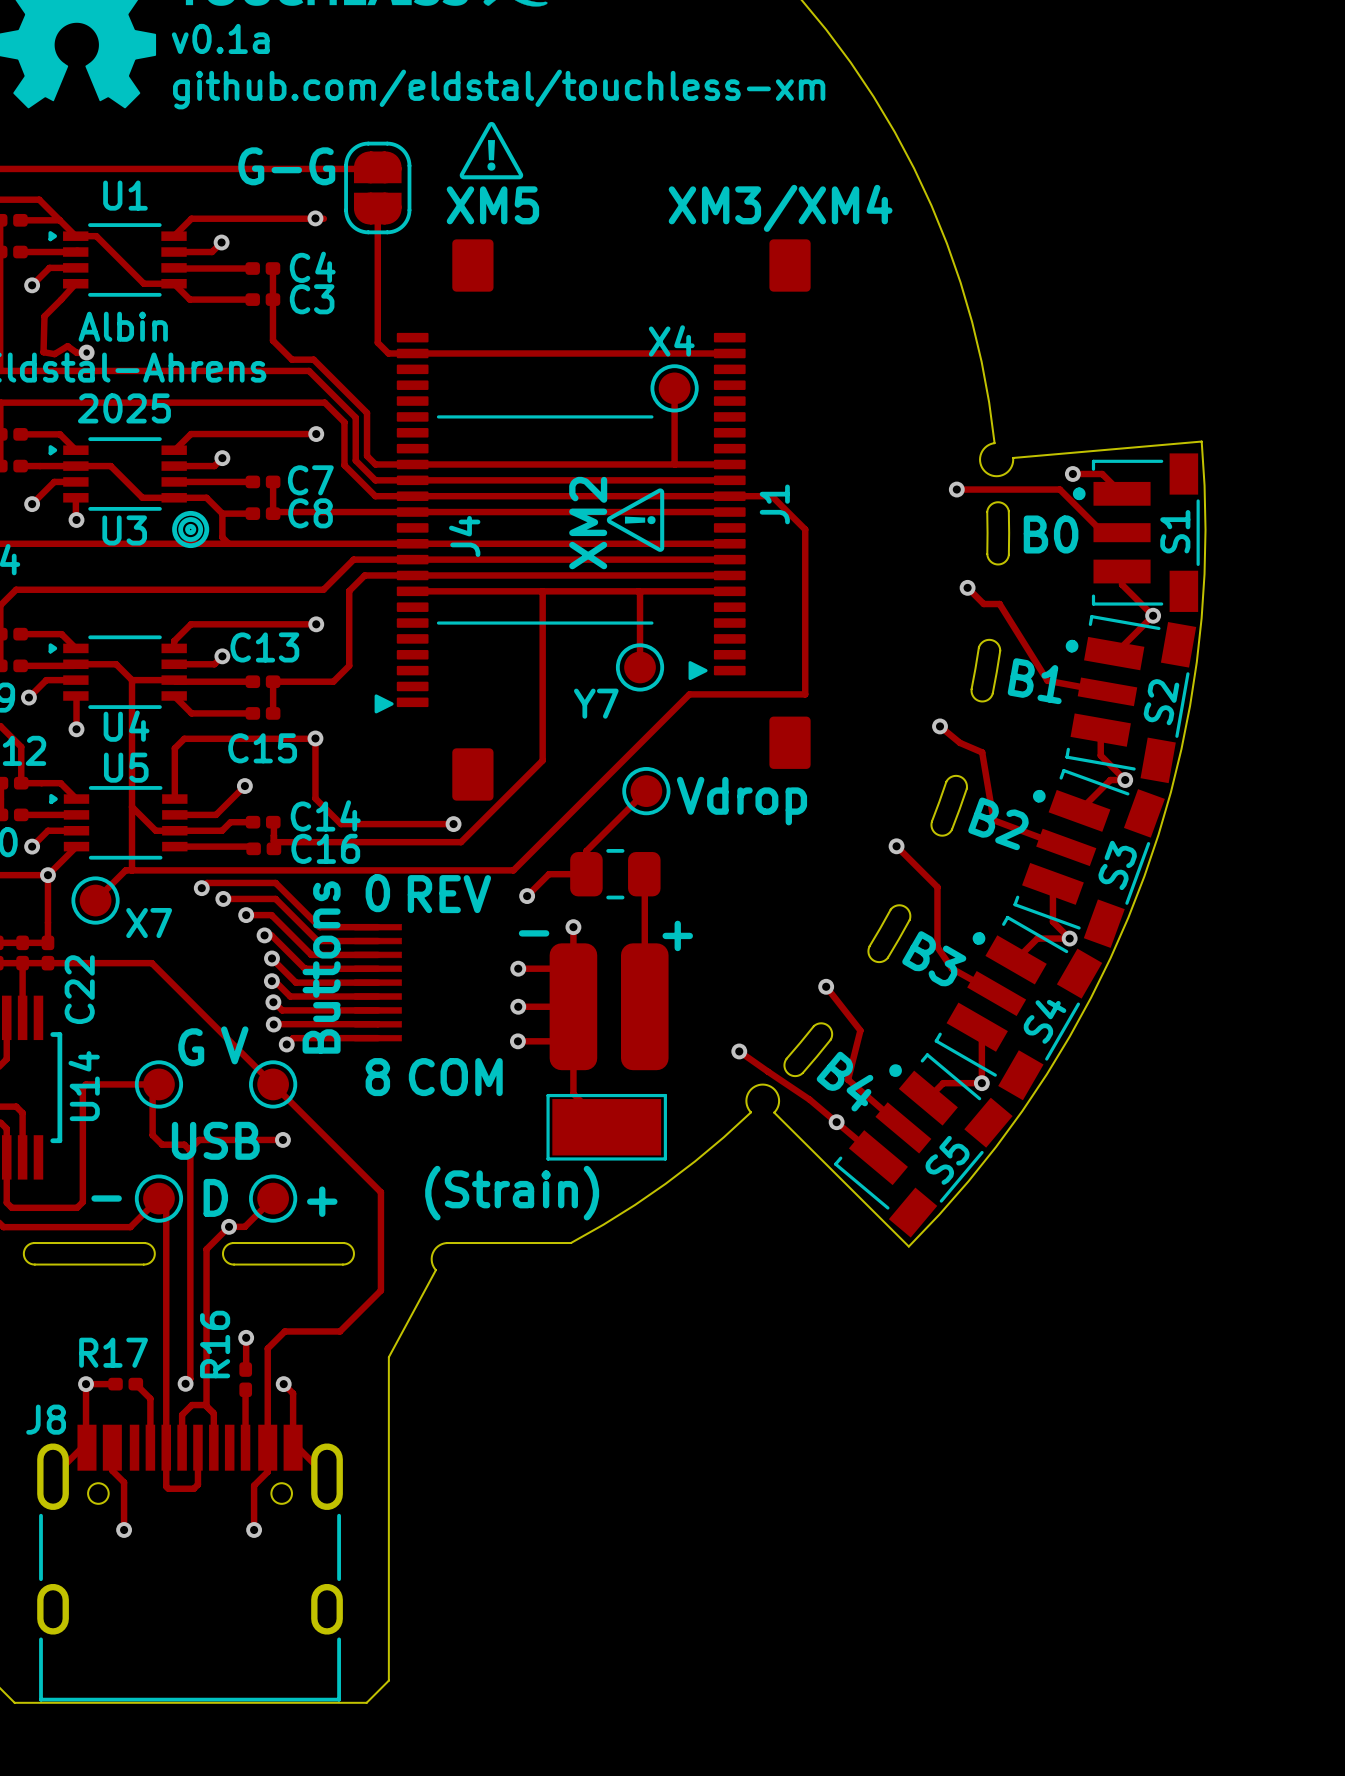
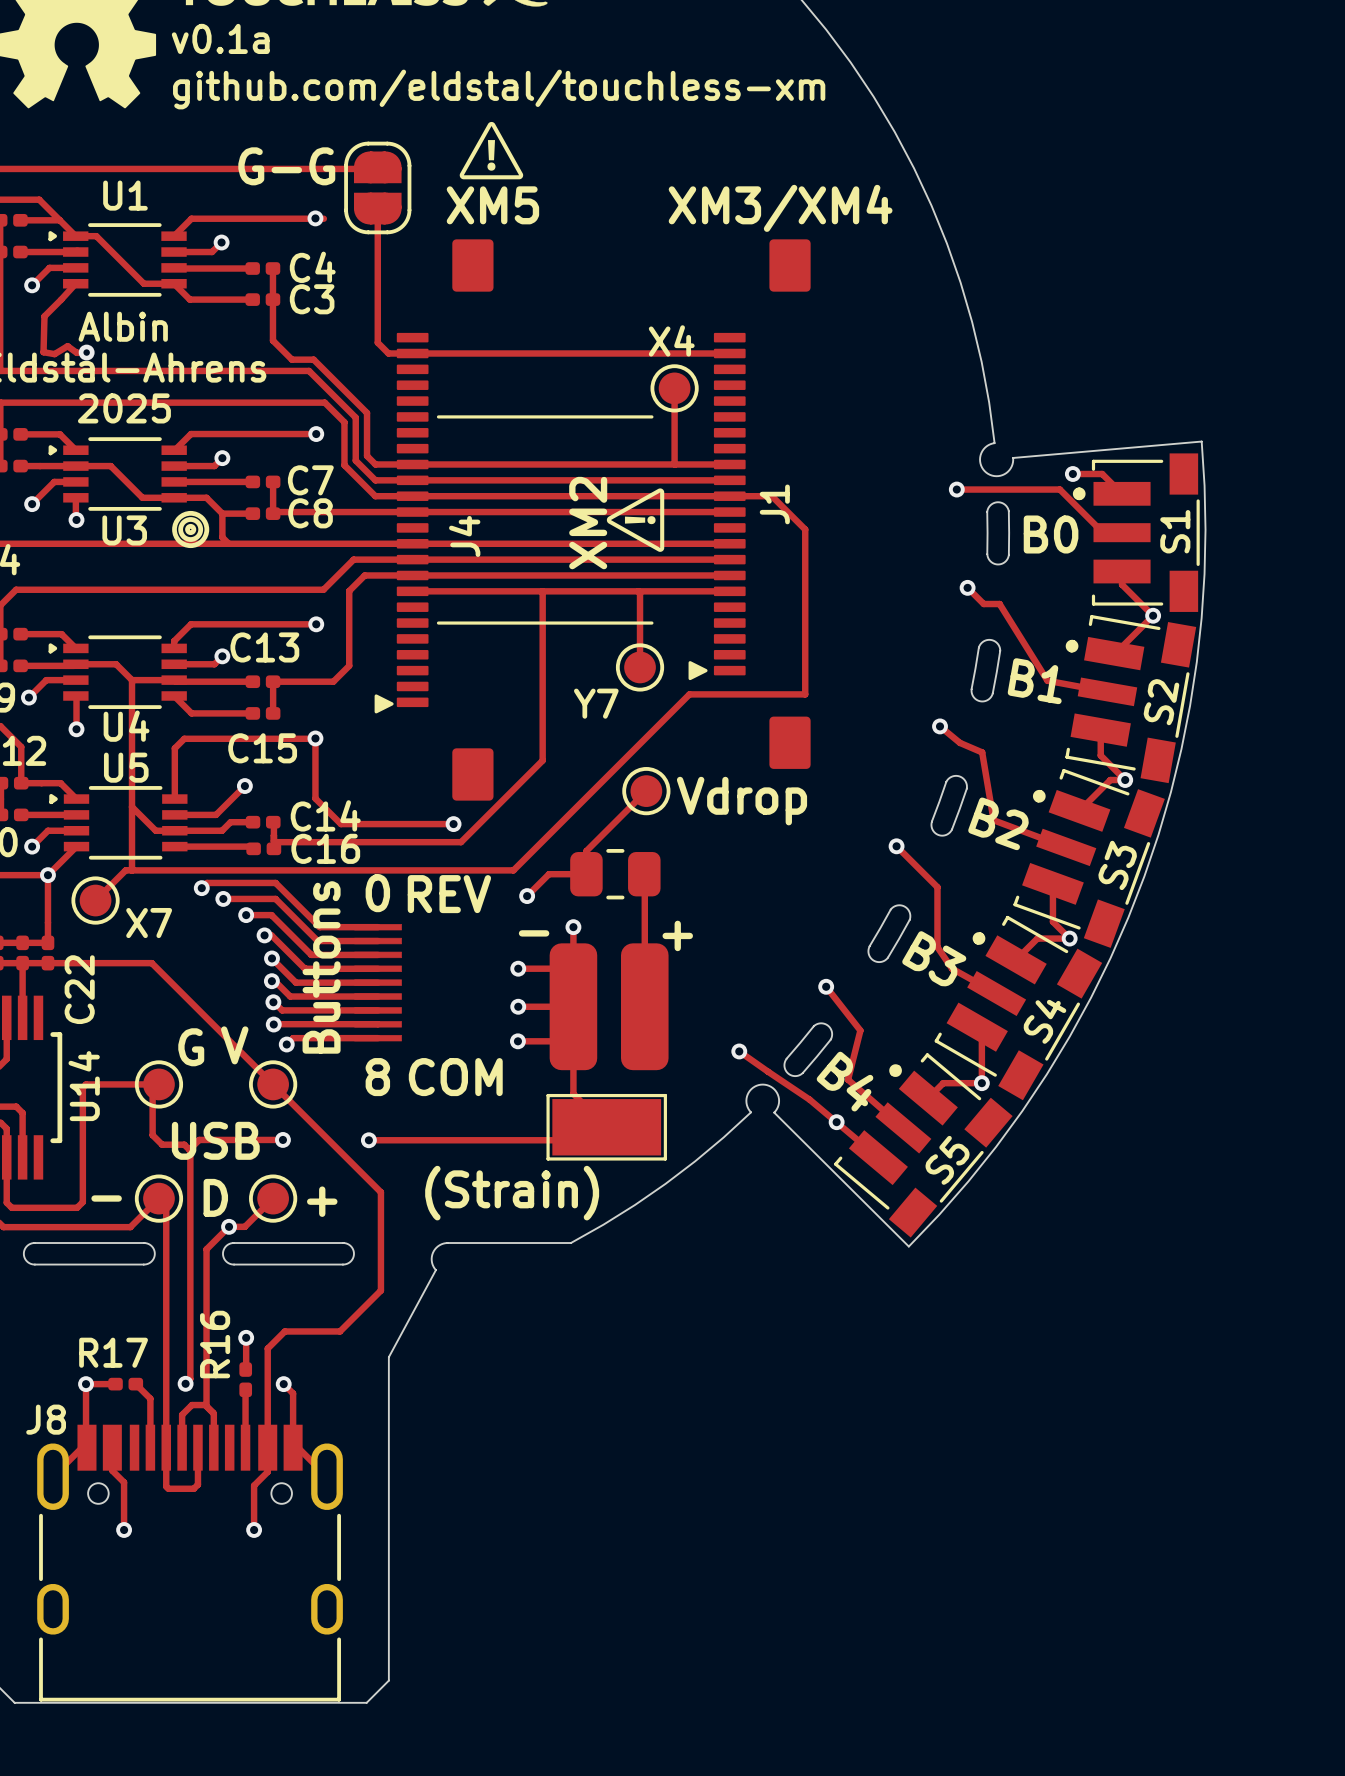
via: none -> (368, 1140)
track: none -> (593, 1140) (369, 1140)

